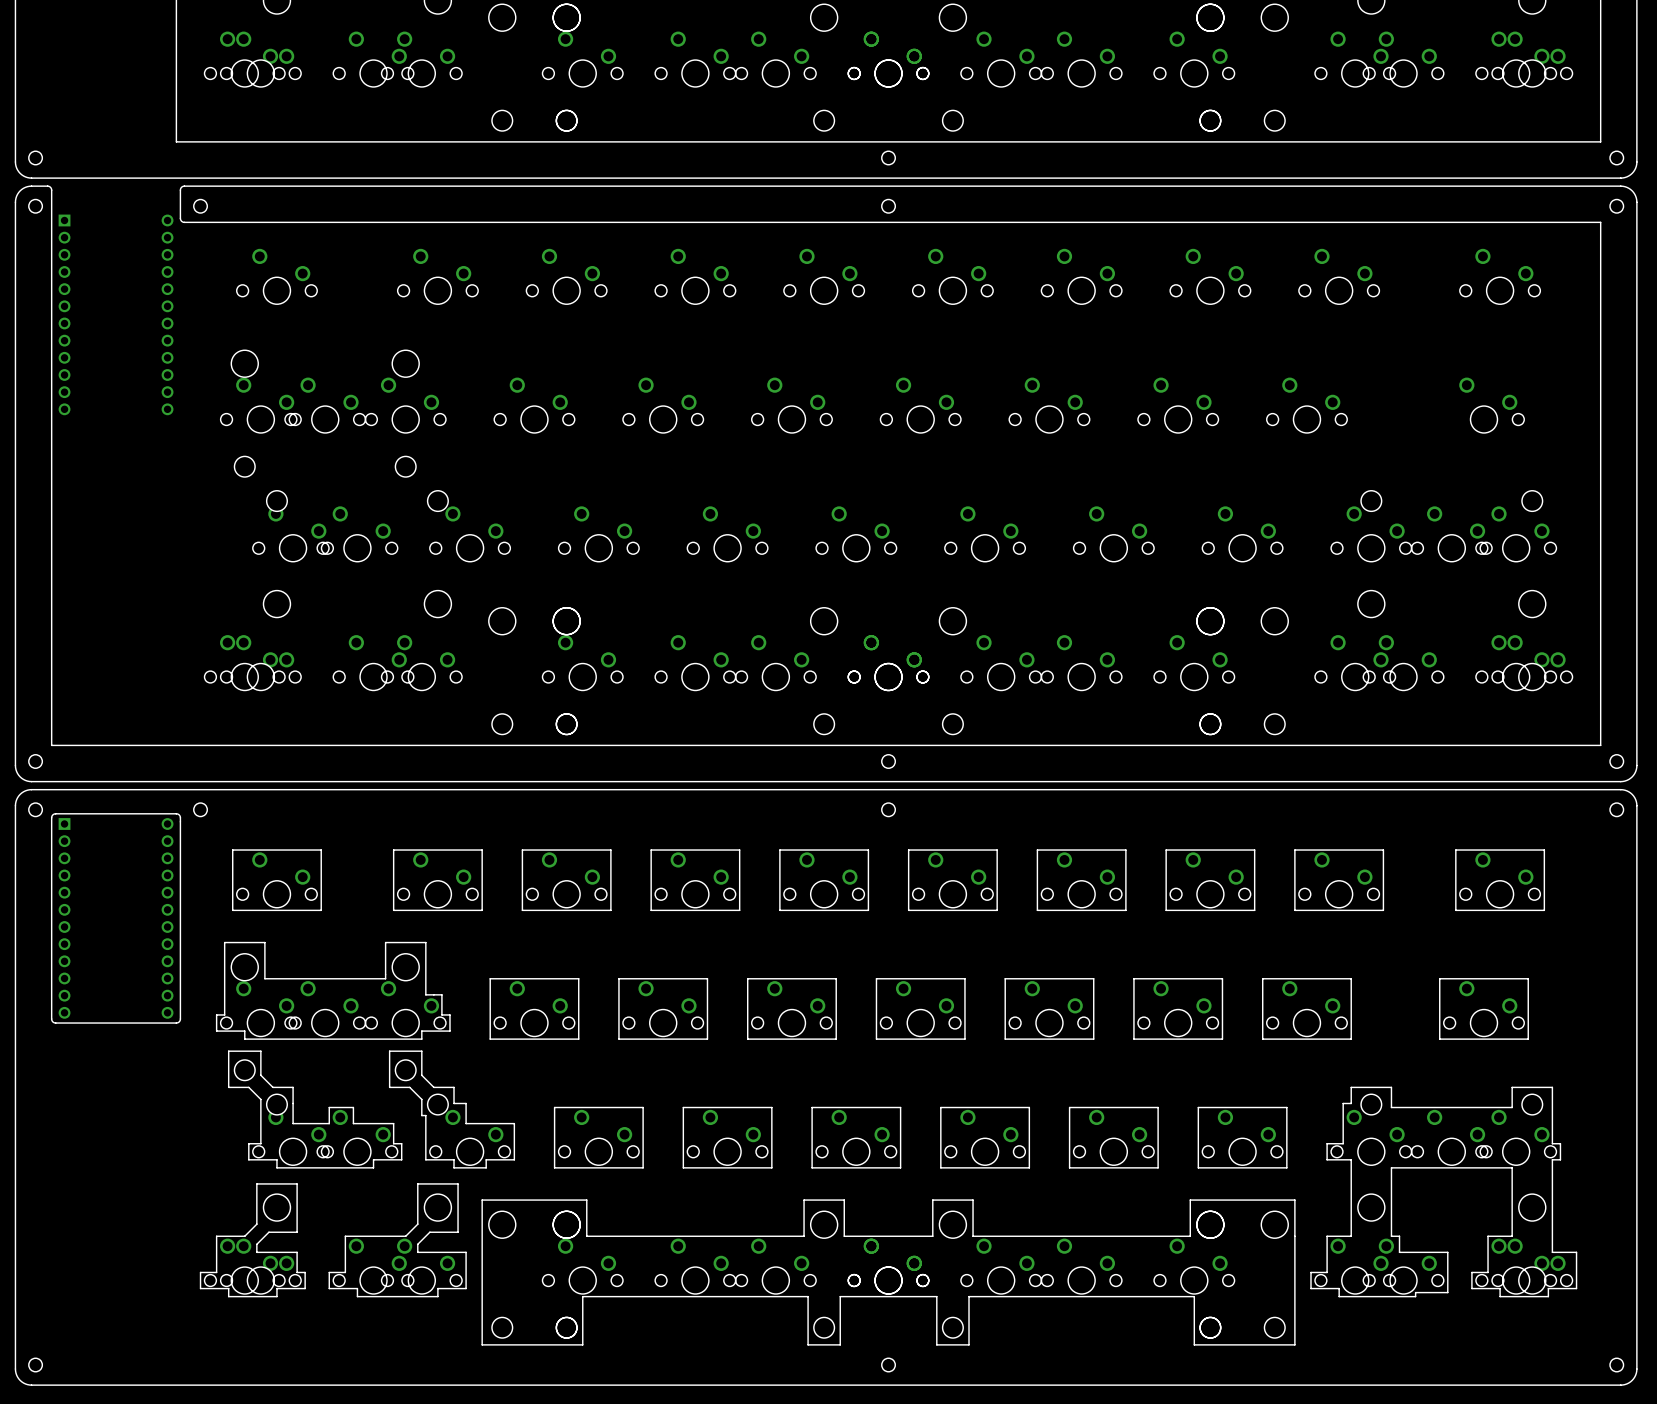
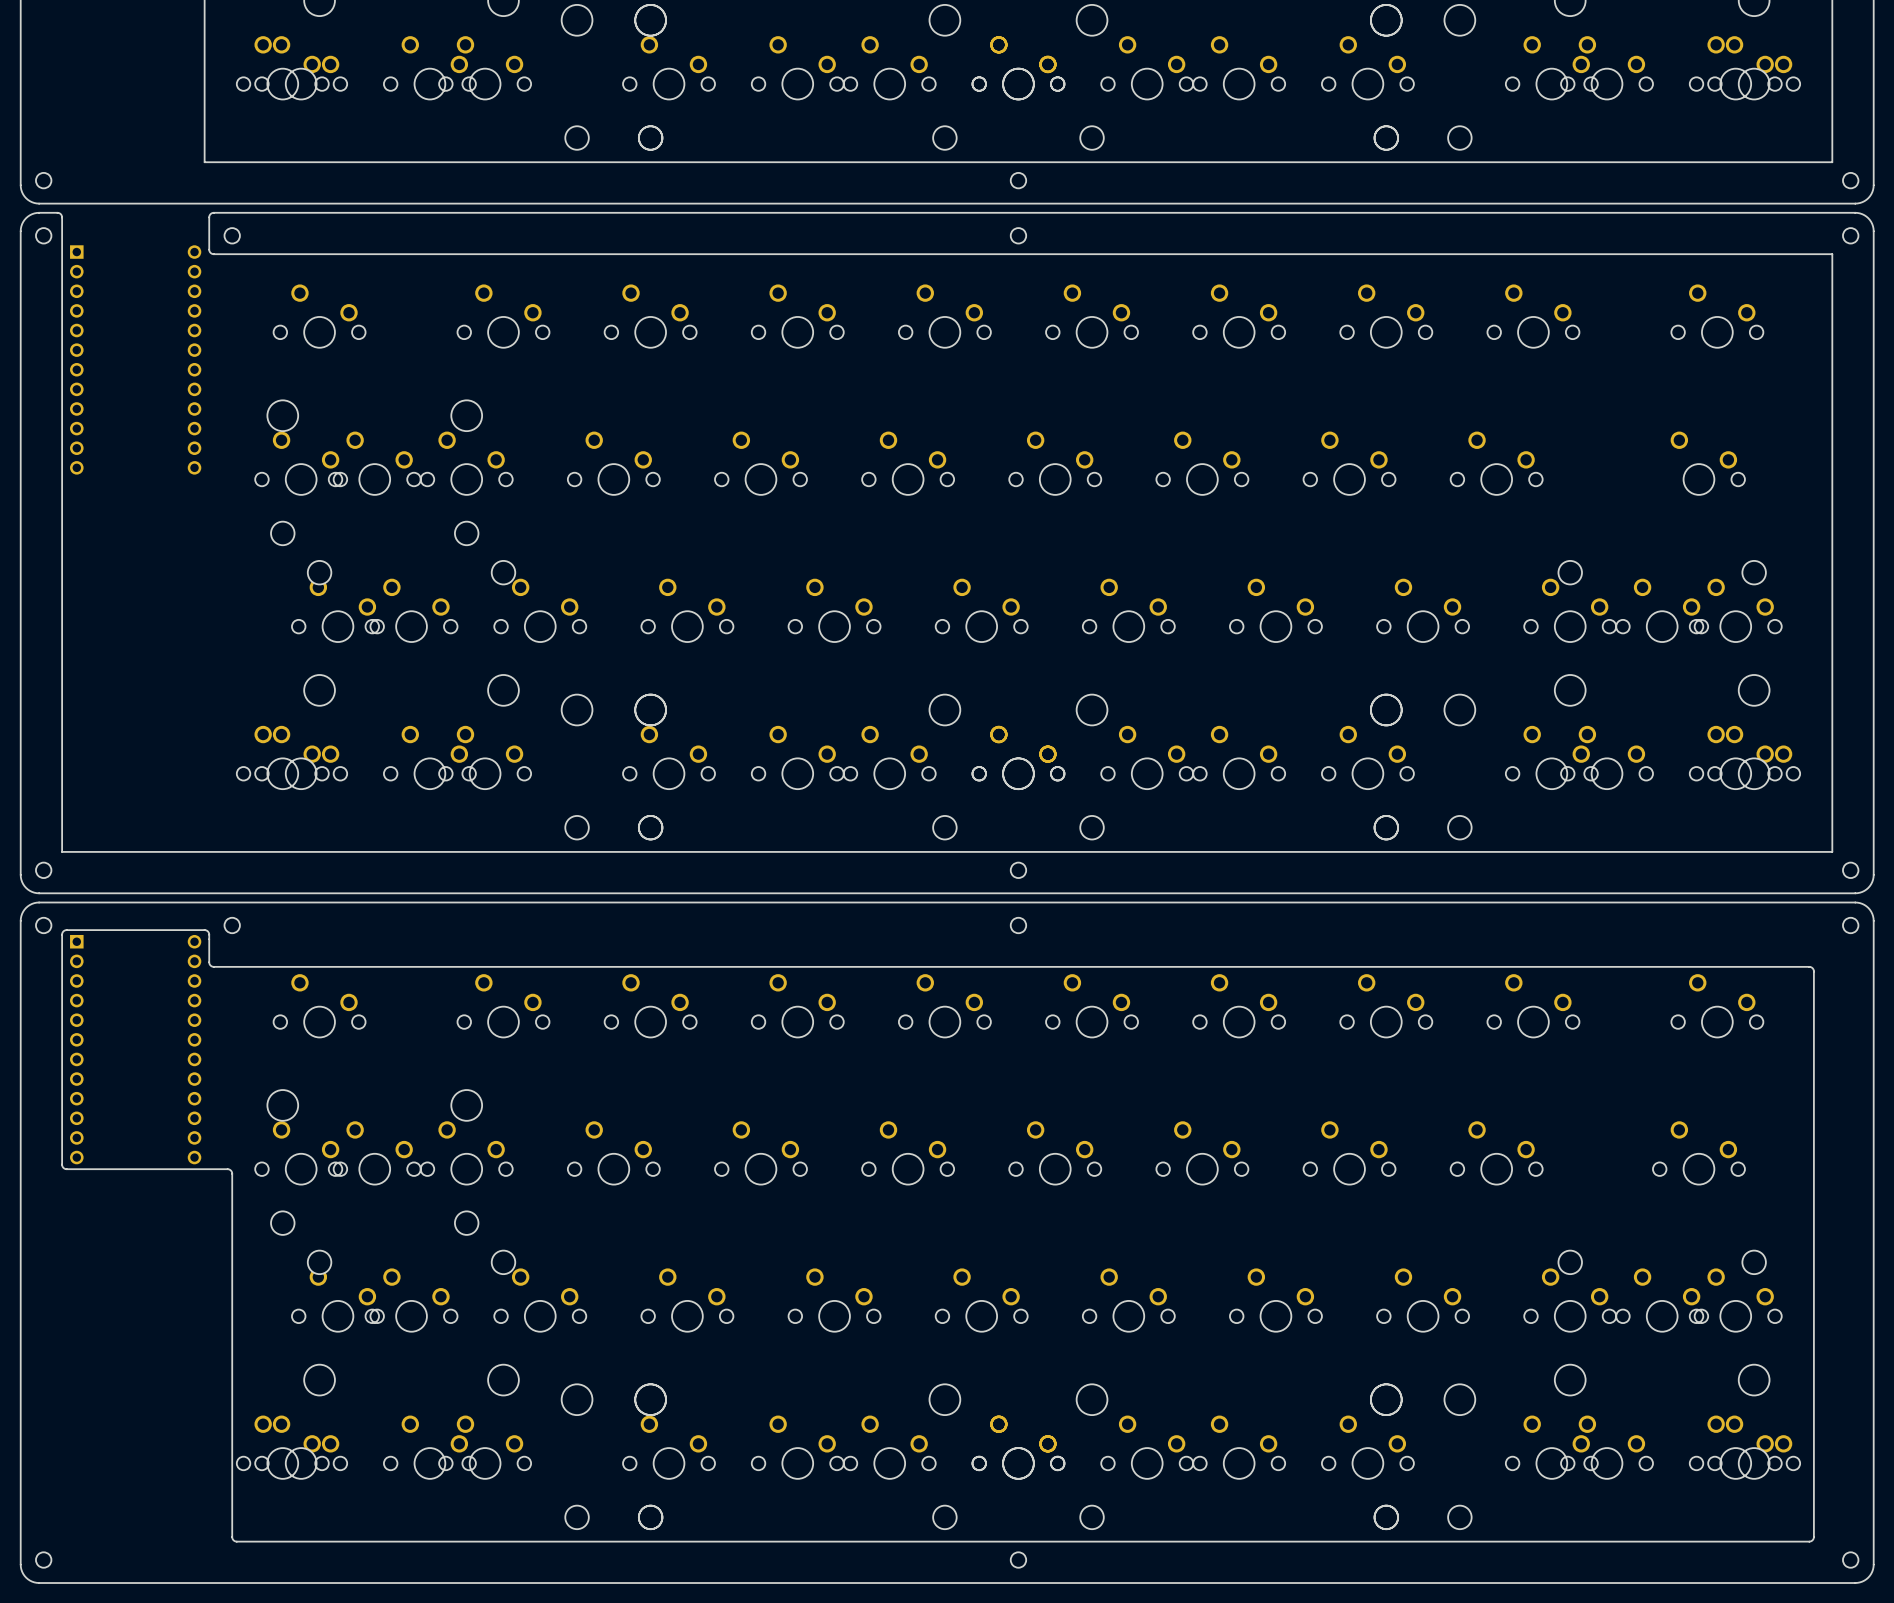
board edge: (180, 841) (180, 1019) (176, 1023) -> (209, 962) (213, 966) (1809, 966) (1813, 971) (1813, 1537) (1810, 1541) (236, 1541) (232, 1537) (232, 1472)
board edge: (321, 850) (232, 850) (232, 910) (321, 910) (321, 850) -> none
board edge: (482, 850) (482, 910) (393, 910) (393, 850) (482, 850) -> none
board edge: (610, 850) (522, 850) (522, 910) (610, 910) (610, 850) -> none
board edge: (739, 850) (651, 850) (651, 910) (739, 910) (739, 850) -> none
board edge: (868, 850) (779, 850) (779, 910) (868, 910) (868, 850) -> none
board edge: (997, 850) (908, 850) (908, 910) (997, 910) (997, 850) -> none
board edge: (1125, 850) (1037, 850) (1037, 910) (1125, 910) (1125, 850) -> none
board edge: (1254, 850) (1166, 850) (1166, 910) (1254, 910) (1254, 850) -> none
board edge: (1383, 850) (1294, 850) (1294, 910) (1383, 910) (1383, 850) -> none
board edge: (1544, 850) (1455, 850) (1455, 910) (1544, 910) (1544, 850) -> none
board edge: (425, 942) (385, 942) (385, 978) (264, 978) (264, 942) (224, 942) (224, 1014) (216, 1014) (216, 1031) (244, 1031) (244, 1039) (421, 1039) (421, 1031) (449, 1031) (449, 1014) (441, 1014) (441, 994) (425, 994) (425, 942) -> none
board edge: (578, 978) (490, 978) (490, 1039) (578, 1039) (578, 978) -> none
board edge: (707, 978) (618, 978) (618, 1039) (707, 1039) (707, 978) -> none
board edge: (836, 978) (747, 978) (747, 1039) (836, 1039) (836, 978) -> none
board edge: (964, 978) (876, 978) (876, 1039) (964, 1039) (964, 978) -> none
board edge: (1093, 978) (1005, 978) (1005, 1039) (1093, 1039) (1093, 978) -> none
board edge: (1222, 978) (1133, 978) (1133, 1039) (1222, 1039) (1222, 978) -> none
board edge: (1351, 978) (1262, 978) (1262, 1039) (1351, 1039) (1351, 978) -> none
board edge: (1528, 978) (1439, 978) (1439, 1039) (1528, 1039) (1528, 978) -> none
board edge: (260, 1051) (260, 1075) (272, 1087) (293, 1087) (293, 1123) (329, 1123) (329, 1107) (353, 1107) (353, 1123) (393, 1123) (393, 1143) (401, 1143) (401, 1159) (373, 1159) (373, 1167) (276, 1167) (276, 1159) (248, 1159) (248, 1143) (260, 1143) (260, 1099) (248, 1087) (228, 1087) (228, 1051) (260, 1051) -> none
board edge: (421, 1051) (421, 1075) (433, 1087) (454, 1087) (454, 1103) (466, 1103) (466, 1123) (514, 1123) (514, 1159) (486, 1159) (486, 1167) (454, 1167) (454, 1159) (425, 1159) (425, 1115) (421, 1115) (421, 1099) (409, 1087) (389, 1087) (389, 1051) (421, 1051) -> none
board edge: (1552, 1087) (1512, 1087) (1512, 1107) (1391, 1107) (1391, 1087) (1351, 1087) (1351, 1103) (1343, 1103) (1343, 1143) (1327, 1143) (1327, 1159) (1351, 1159) (1351, 1236) (1327, 1236) (1327, 1272) (1310, 1272) (1310, 1288) (1339, 1288) (1339, 1296) (1415, 1296) (1415, 1292) (1447, 1292) (1447, 1252) (1399, 1252) (1399, 1236) (1391, 1236) (1391, 1167) (1512, 1167) (1512, 1236) (1488, 1236) (1488, 1272) (1471, 1272) (1471, 1288) (1500, 1288) (1500, 1296) (1548, 1296) (1548, 1288) (1576, 1288) (1576, 1252) (1552, 1252) (1552, 1159) (1560, 1159) (1560, 1143) (1552, 1143) (1552, 1087) -> none
board edge: (643, 1107) (554, 1107) (554, 1167) (643, 1167) (643, 1107) -> none
board edge: (771, 1107) (683, 1107) (683, 1167) (771, 1167) (771, 1107) -> none
board edge: (900, 1107) (812, 1107) (812, 1167) (900, 1167) (900, 1107) -> none
board edge: (1029, 1107) (940, 1107) (940, 1167) (1029, 1167) (1029, 1107) -> none
board edge: (1158, 1107) (1069, 1107) (1069, 1167) (1158, 1167) (1158, 1107) -> none
board edge: (1286, 1107) (1198, 1107) (1198, 1167) (1286, 1167) (1286, 1107) -> none
board edge: (458, 1183) (458, 1232) (429, 1232) (417, 1244) (417, 1252) (466, 1252) (466, 1288) (437, 1288) (437, 1296) (357, 1296) (357, 1288) (329, 1288) (329, 1272) (345, 1272) (345, 1236) (405, 1236) (417, 1224) (417, 1183) (458, 1183) -> none
board edge: (1294, 1200) (1294, 1344) (1194, 1344) (1194, 1296) (969, 1296) (969, 1344) (936, 1344) (936, 1296) (840, 1296) (840, 1344) (808, 1344) (808, 1296) (582, 1296) (582, 1344) (482, 1344) (482, 1200) (586, 1200) (586, 1236) (804, 1236) (804, 1200) (844, 1200) (844, 1236) (932, 1236) (932, 1200) (973, 1200) (973, 1236) (1190, 1236) (1190, 1200) (1294, 1200) -> none
board edge: (200, 1272) (216, 1272) (216, 1236) (244, 1236) (256, 1224) (256, 1183) (297, 1183) (297, 1232) (268, 1232) (256, 1244) (256, 1252) (297, 1252) (297, 1272) (305, 1272) (305, 1288) (276, 1288) (276, 1296) (228, 1296) (228, 1288) (200, 1288) -> (232, 1454) (232, 1173) (228, 1169) (204, 1169)

